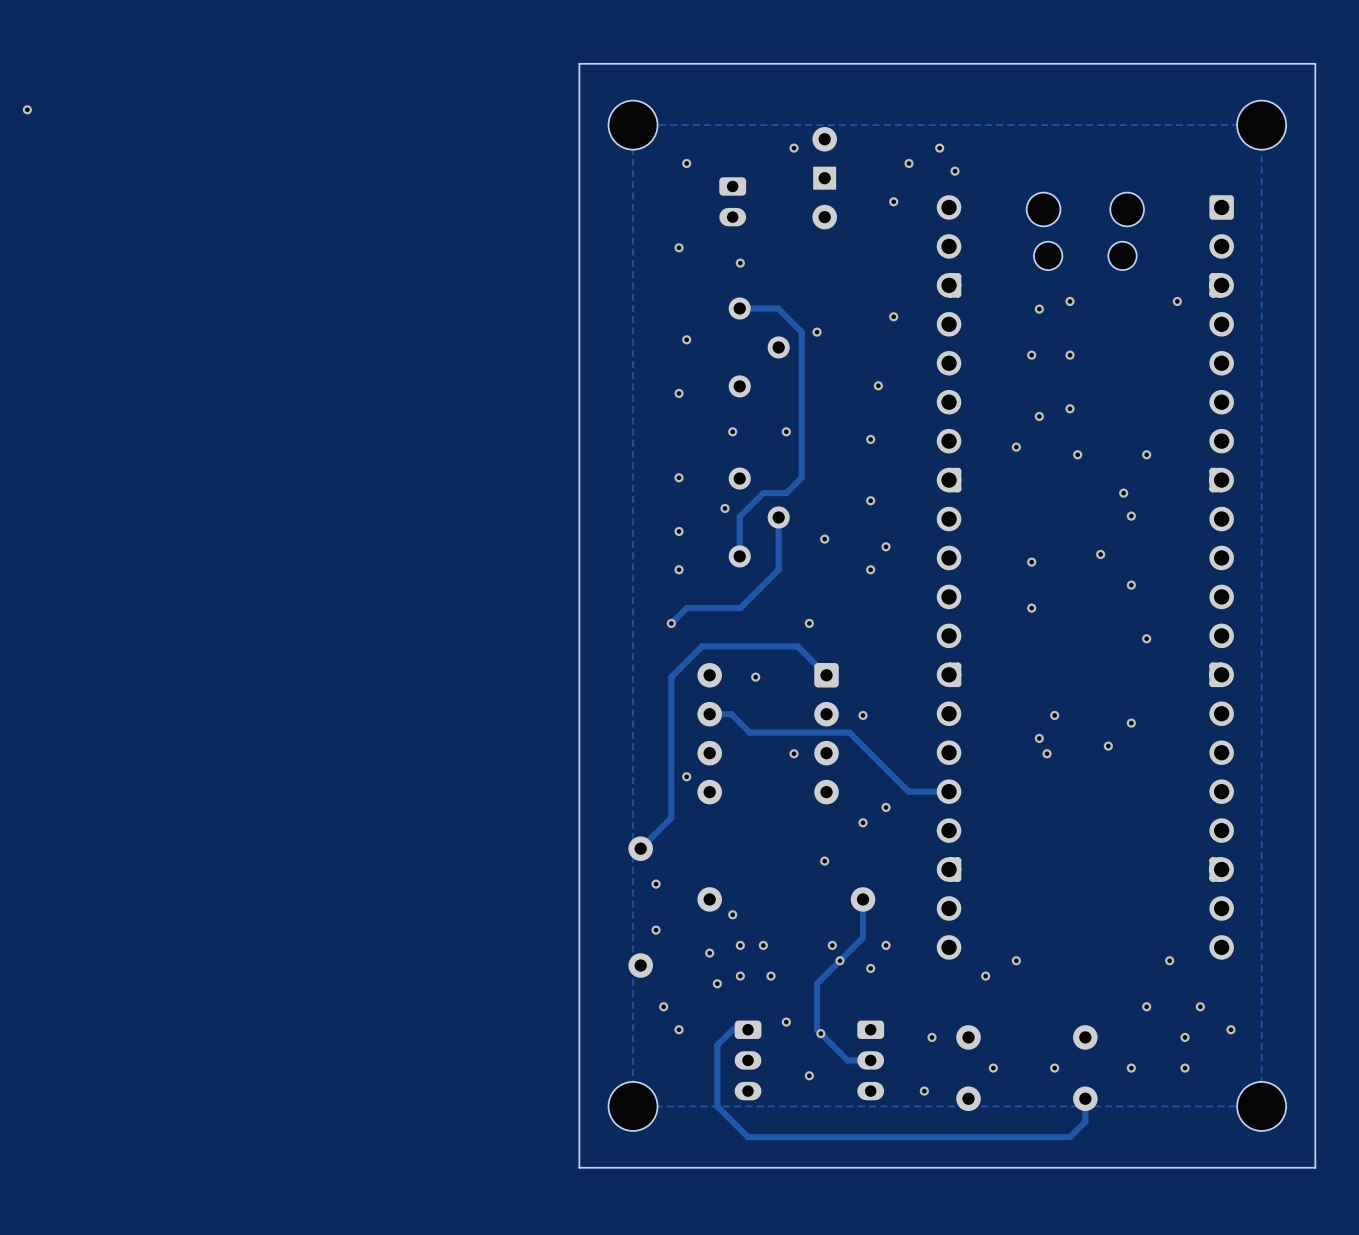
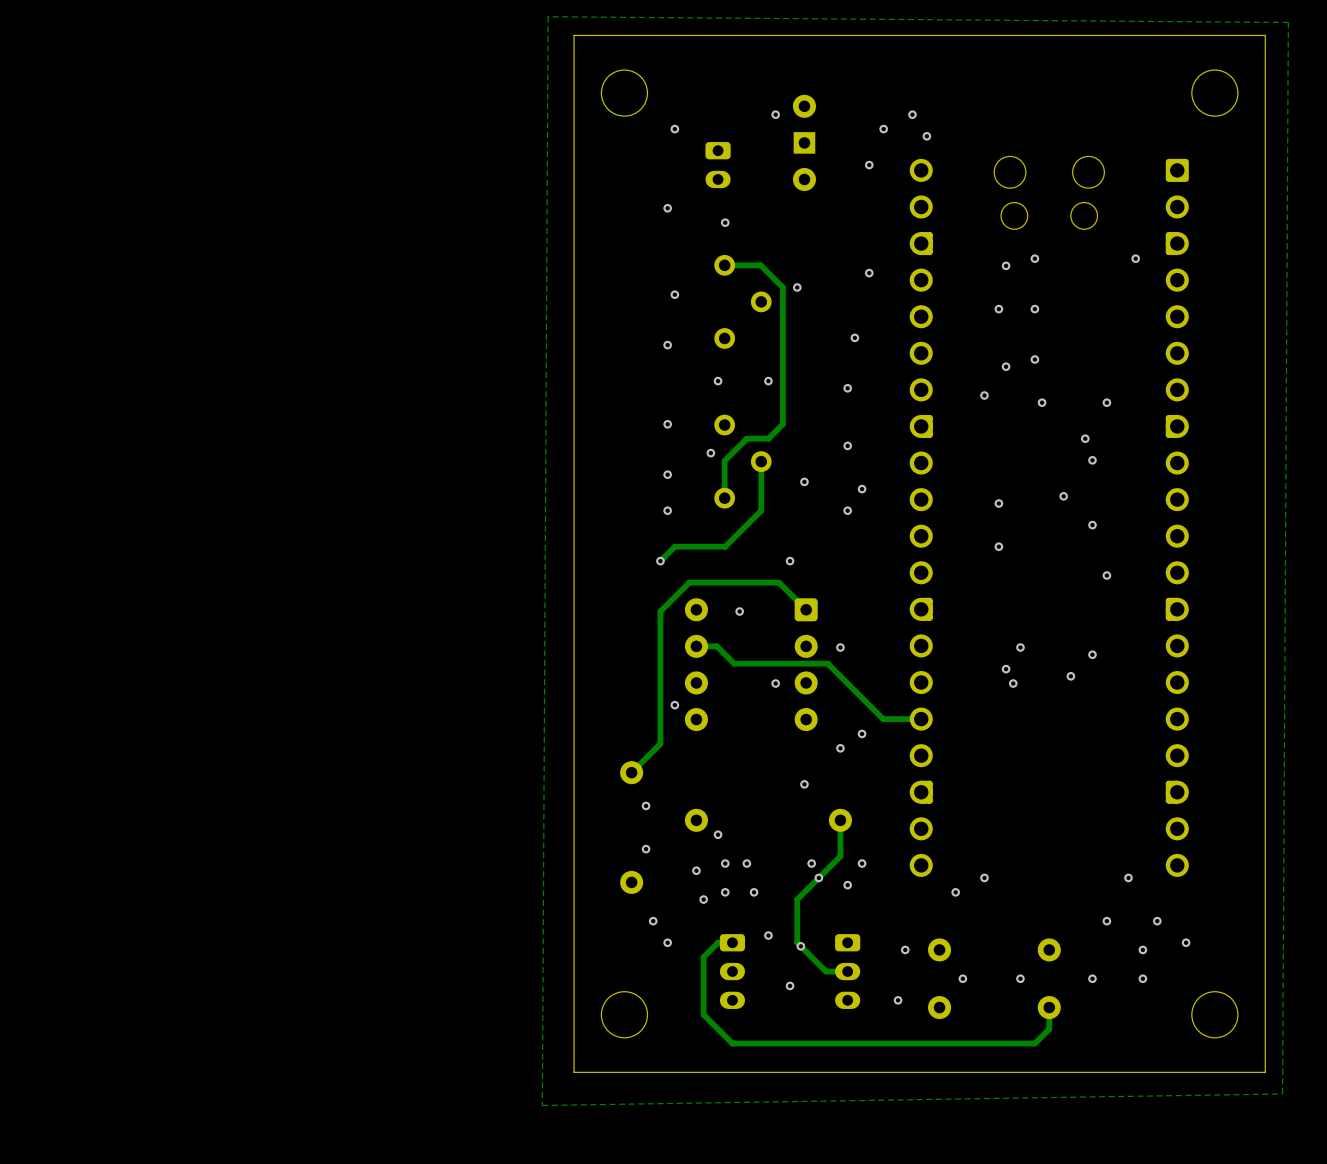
via: (27, 109) -> none
zone outline: (1261, 125) (633, 125) (633, 1106) (1261, 1106) (1261, 125) -> (548, 16) (1288, 22) (1282, 1093) (542, 1105) (548, 16)

